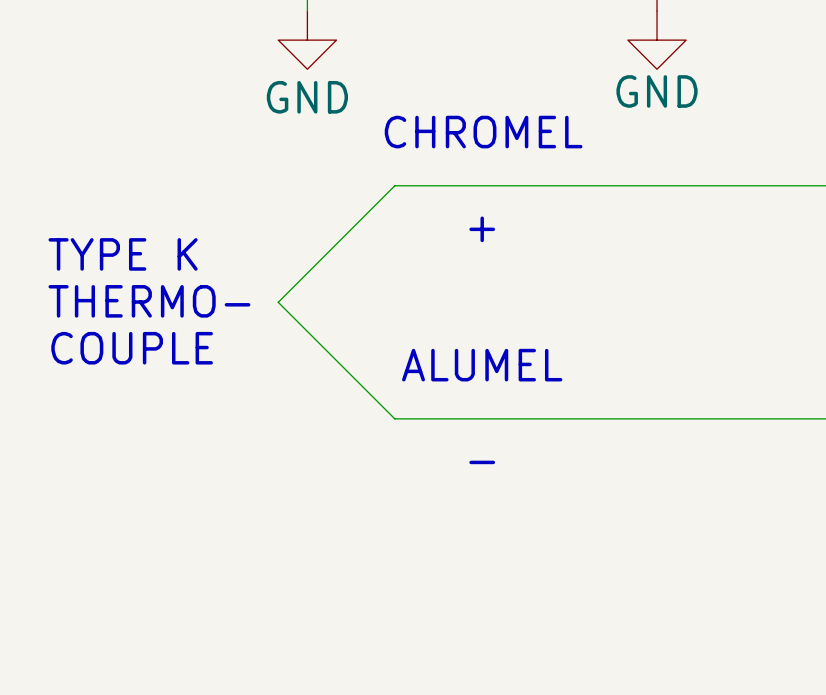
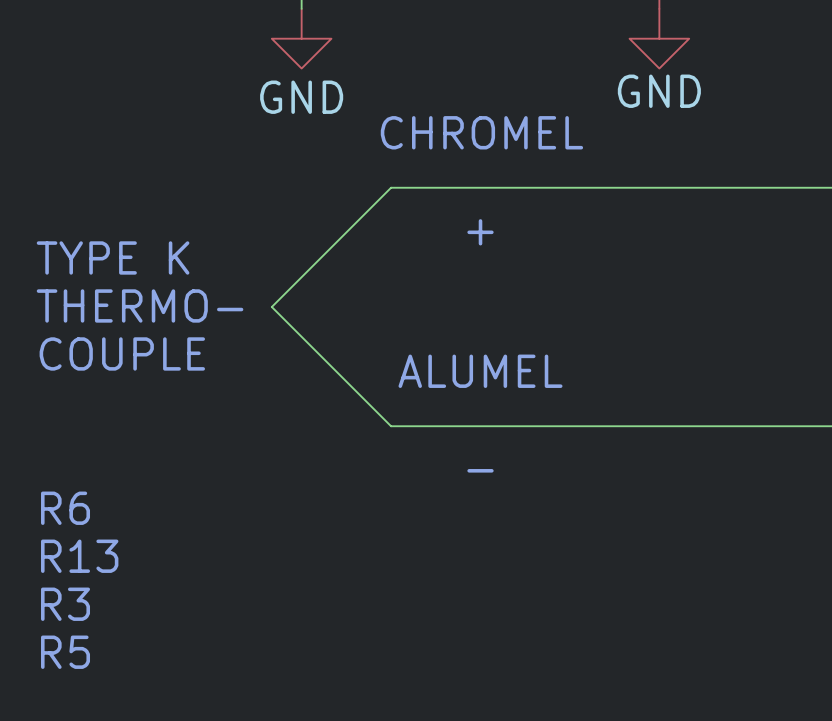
text: none -> R6 (65, 508)
text: none -> R13 (79, 556)
text: none -> R3 (65, 604)
text: none -> R5 (65, 652)

